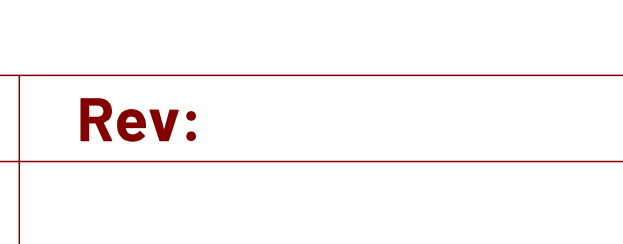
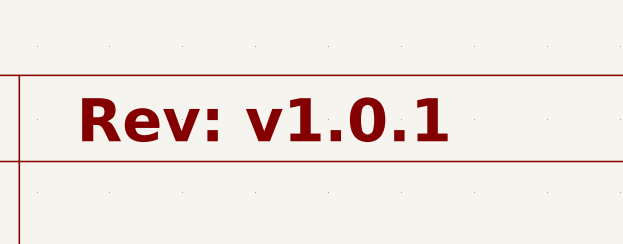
title block: Rev: (138, 119) -> Rev: v1.0.1 (264, 119)

